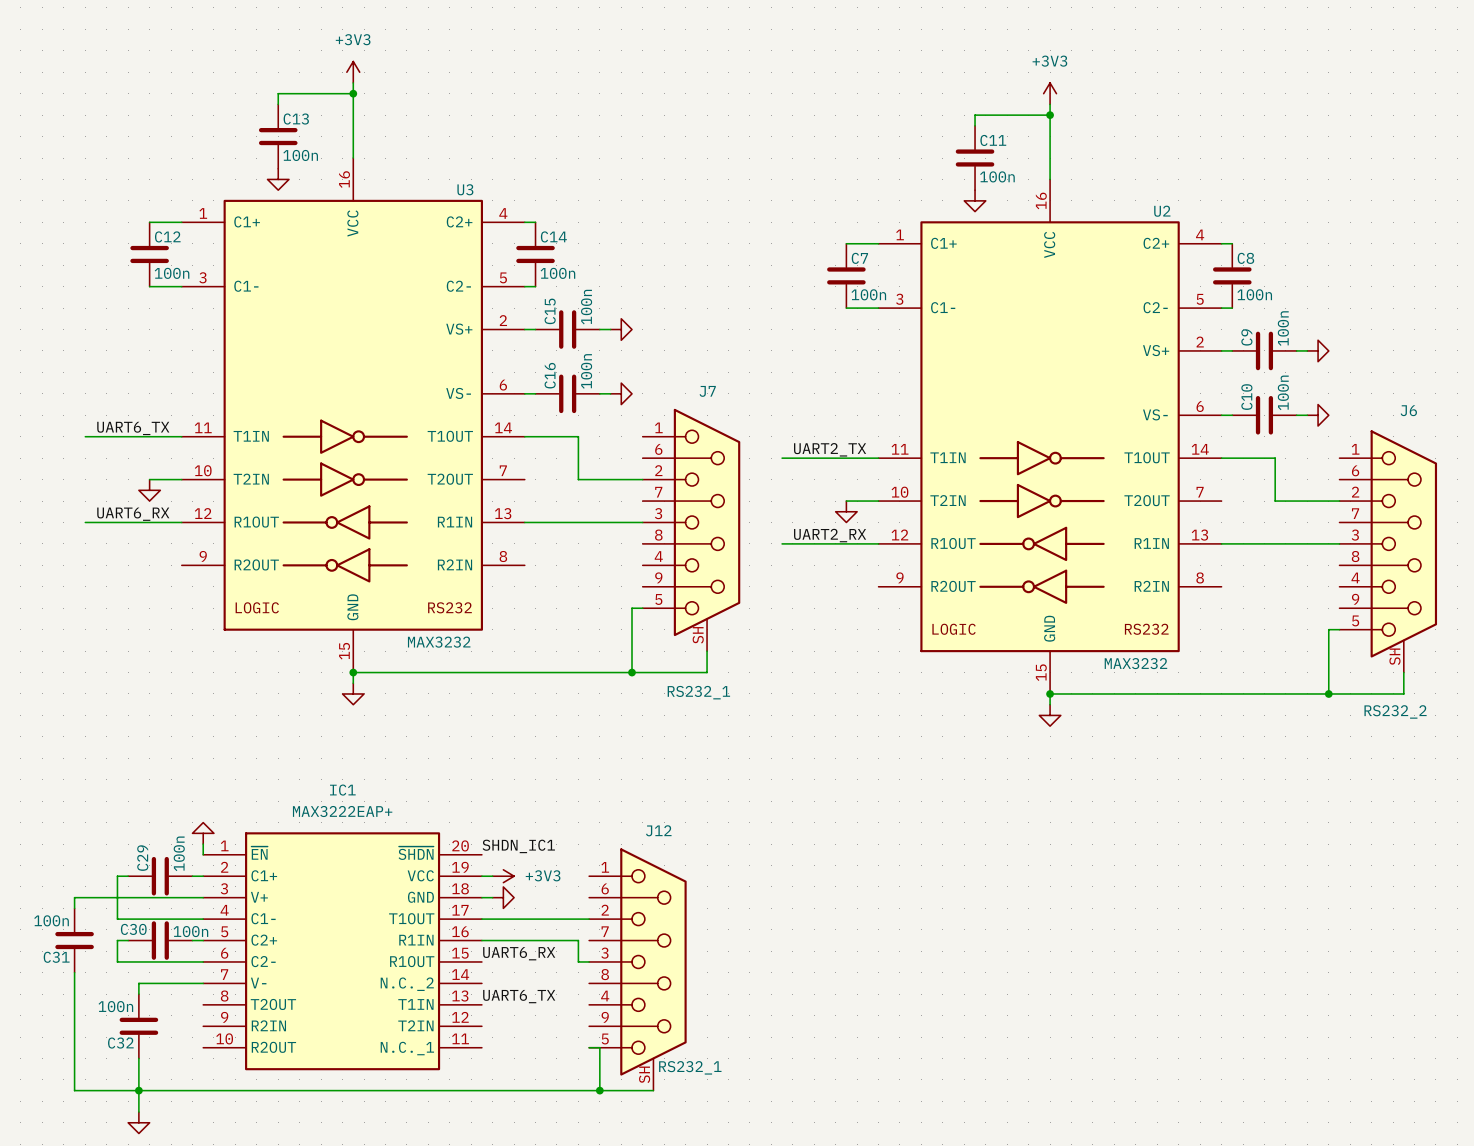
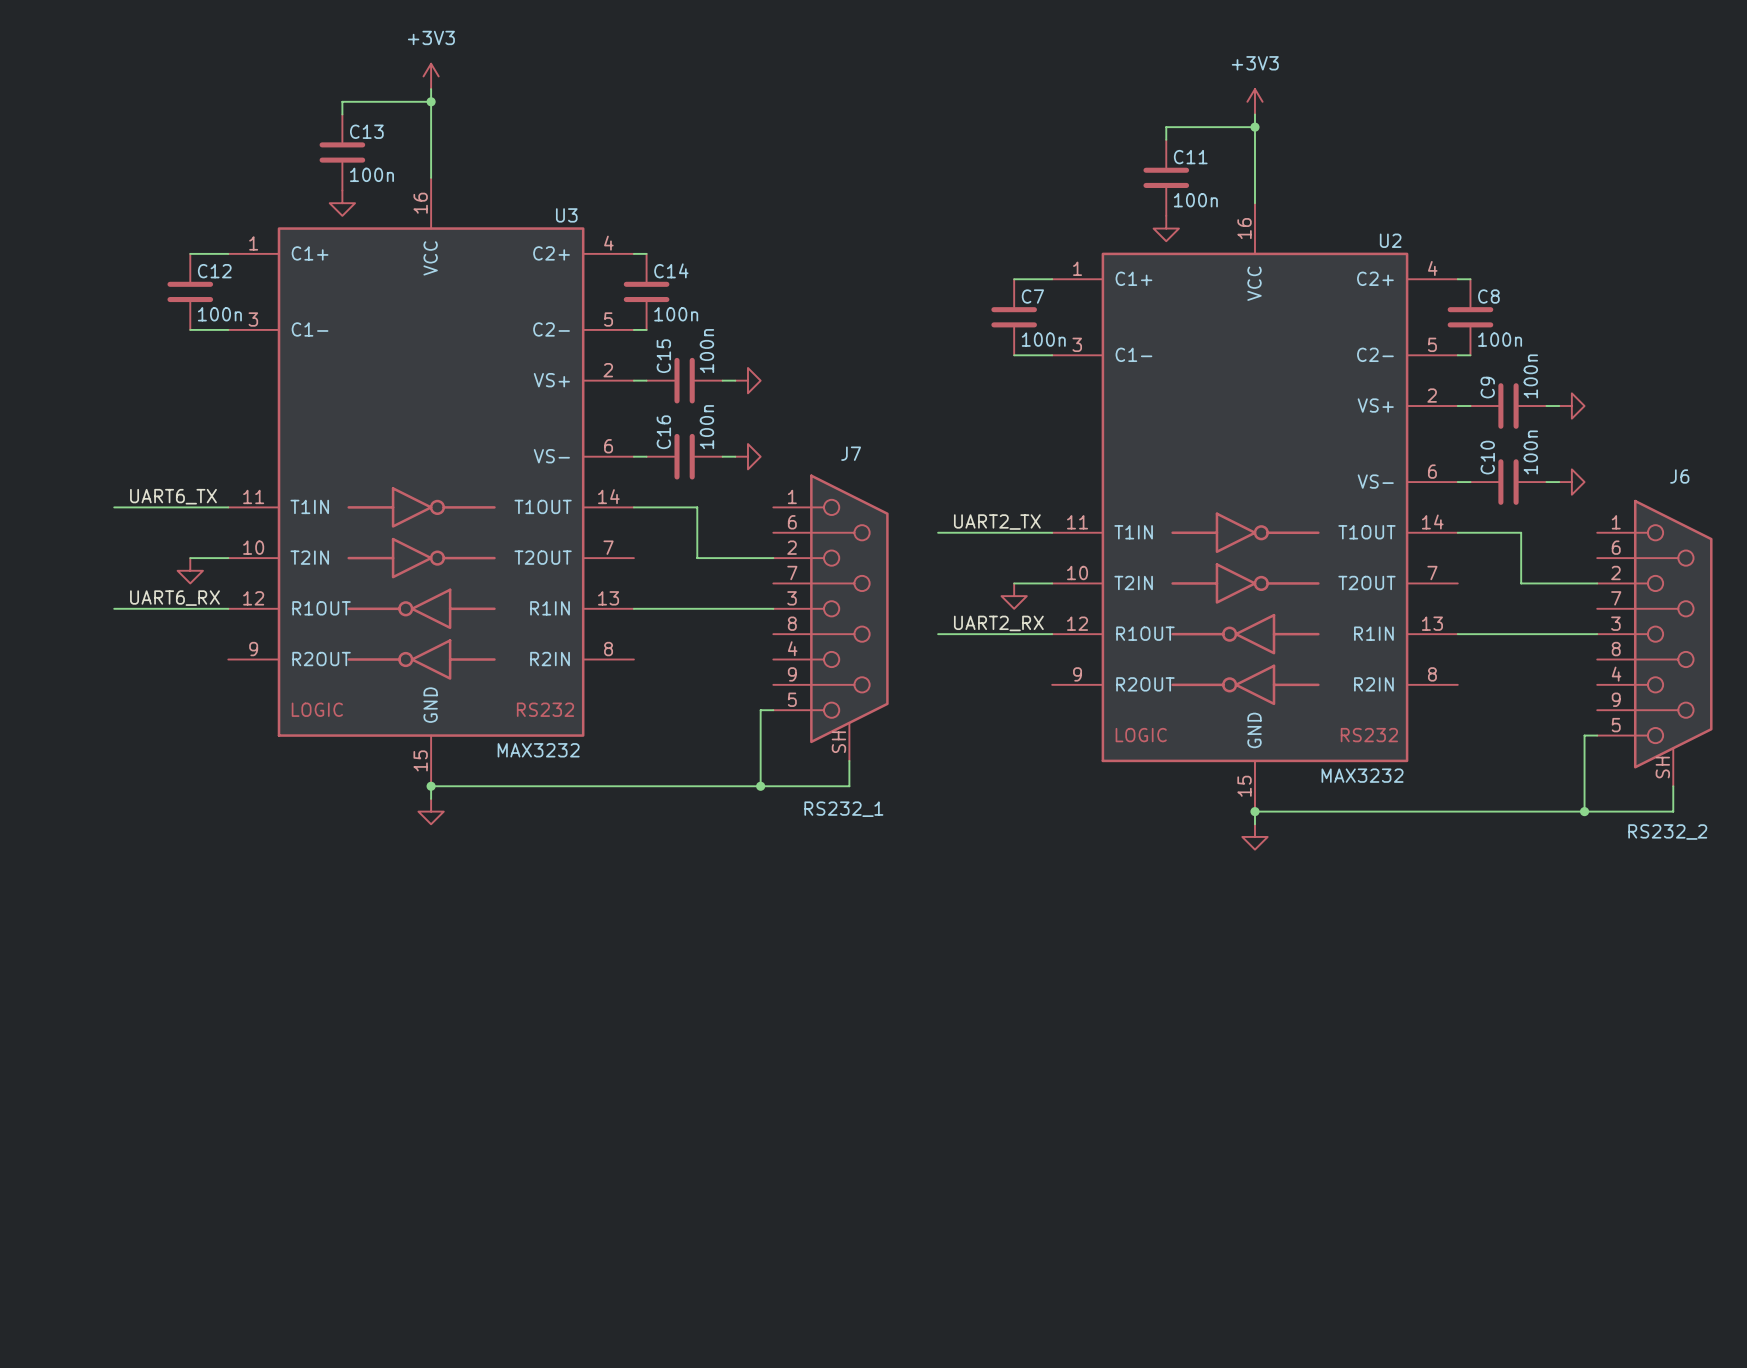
power symbol: (203, 833) -> none
wire: (203, 844) (203, 854) -> none
label: SHDN_IC1 (518, 846) -> none
wire: (128, 876) (117, 876) (117, 919) (203, 919) -> none
C29: 100n (160, 876) -> none
wire: (192, 876) (203, 876) -> none
wire: (481, 876) (492, 876) -> none
power symbol: +3V3 (503, 876) -> none
wire: (203, 897) (74, 897) (74, 908) -> none
wire: (481, 897) (492, 897) -> none
power symbol: (503, 897) -> none
wire: (481, 919) (589, 919) -> none
C31: 100n (74, 940) -> none
wire: (128, 940) (117, 940) (117, 961) (203, 961) -> none
C30: 100n (160, 940) -> none
wire: (192, 940) (203, 940) -> none
wire: (481, 940) (578, 940) (578, 961) (589, 961) -> none
IC1: MAX3222EAP+ (342, 951) -> none
label: UART6_RX (519, 953) -> none
J12: RS232_1 (637, 969) -> none
wire: (74, 972) (74, 1090) (653, 1090) -> none
wire: (203, 983) (138, 983) (138, 994) -> none
label: UART6_TX (519, 996) -> none
C32: 100n (138, 1026) -> none
wire: (589, 1047) (599, 1047) (599, 1090) -> none
wire: (138, 1058) (138, 1112) -> none
junction: (138, 1090) -> none
junction: (599, 1090) -> none
power symbol: (138, 1122) -> none

